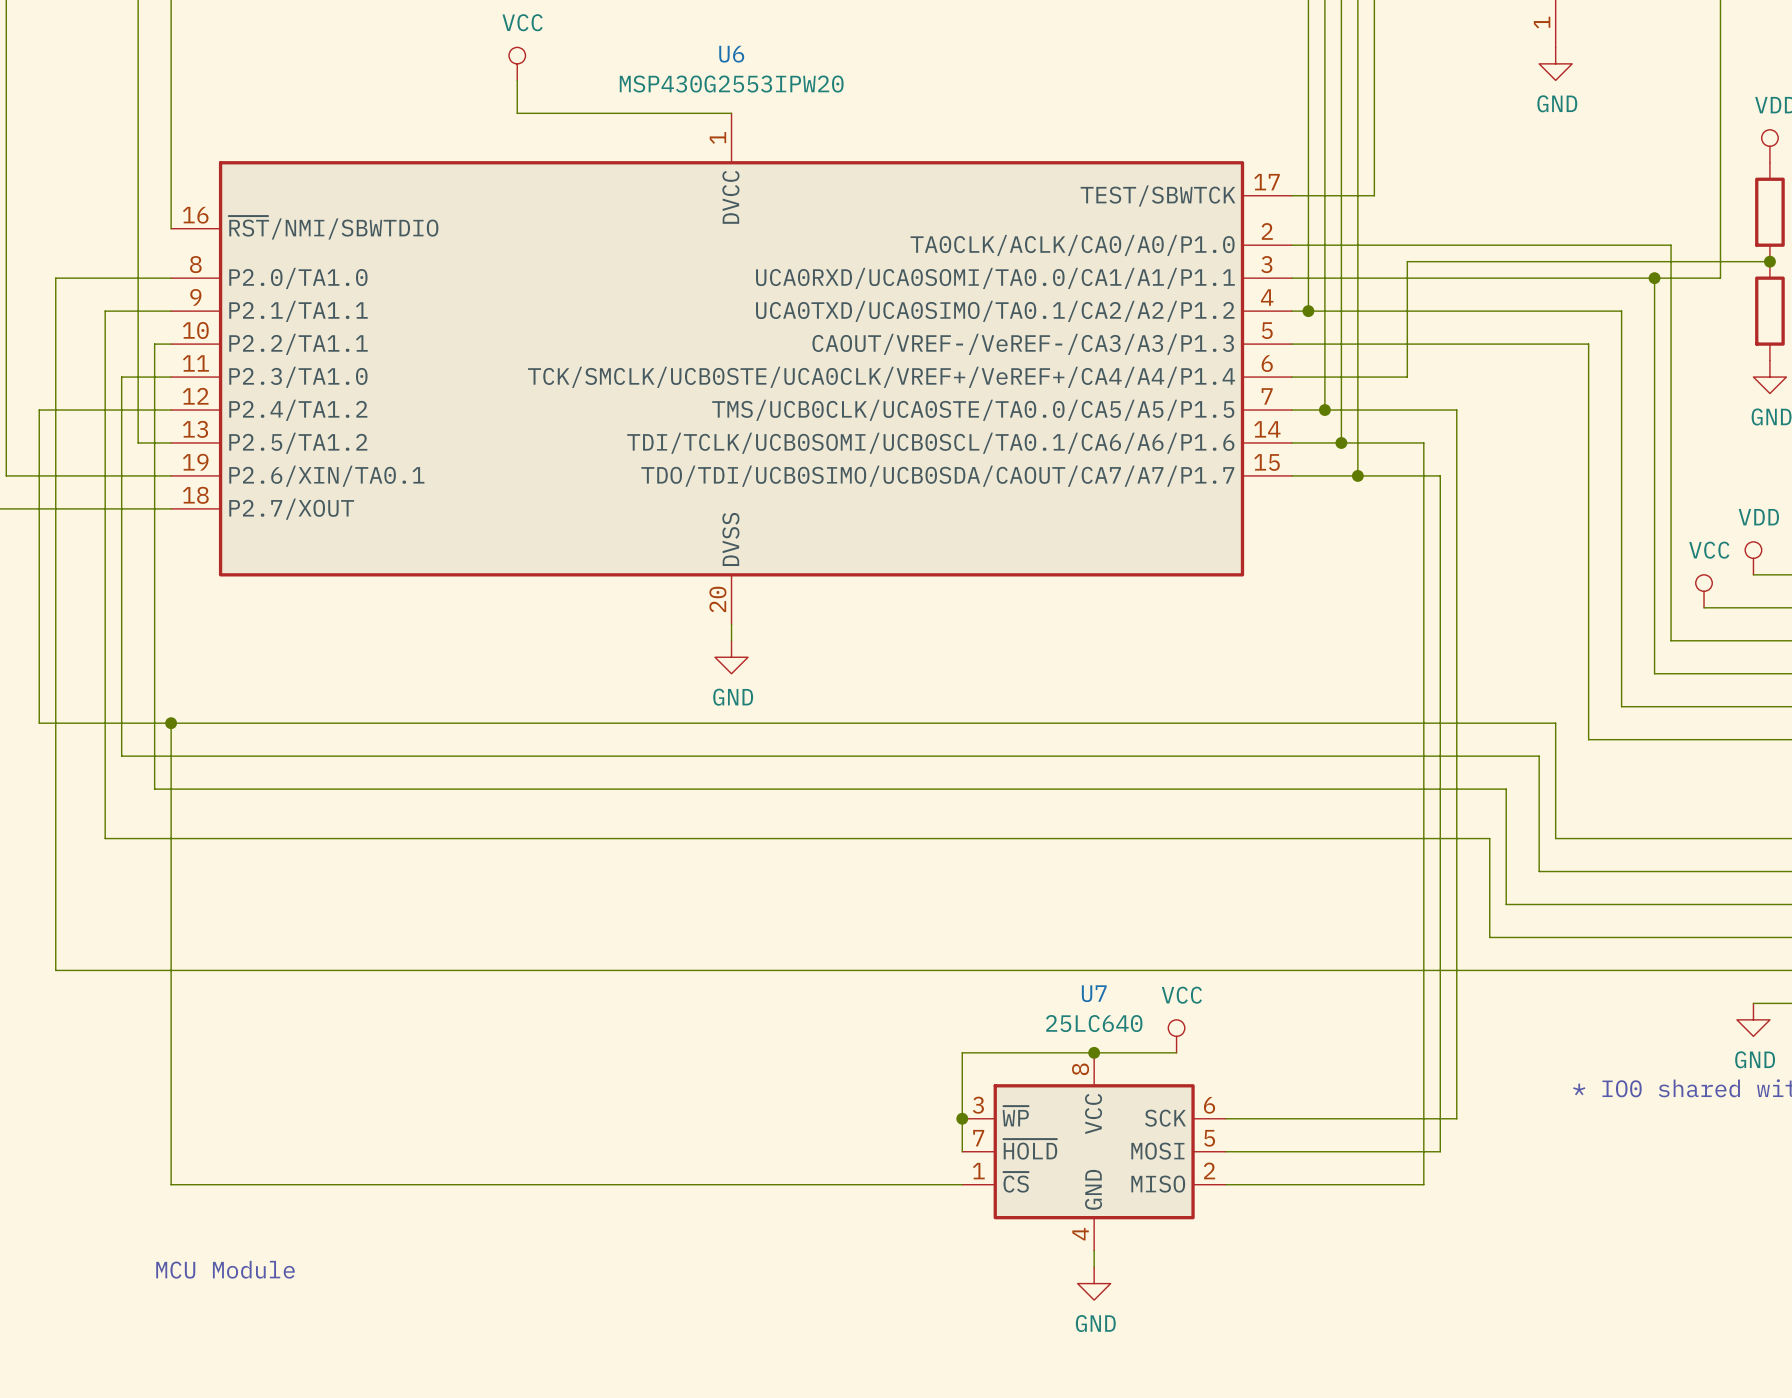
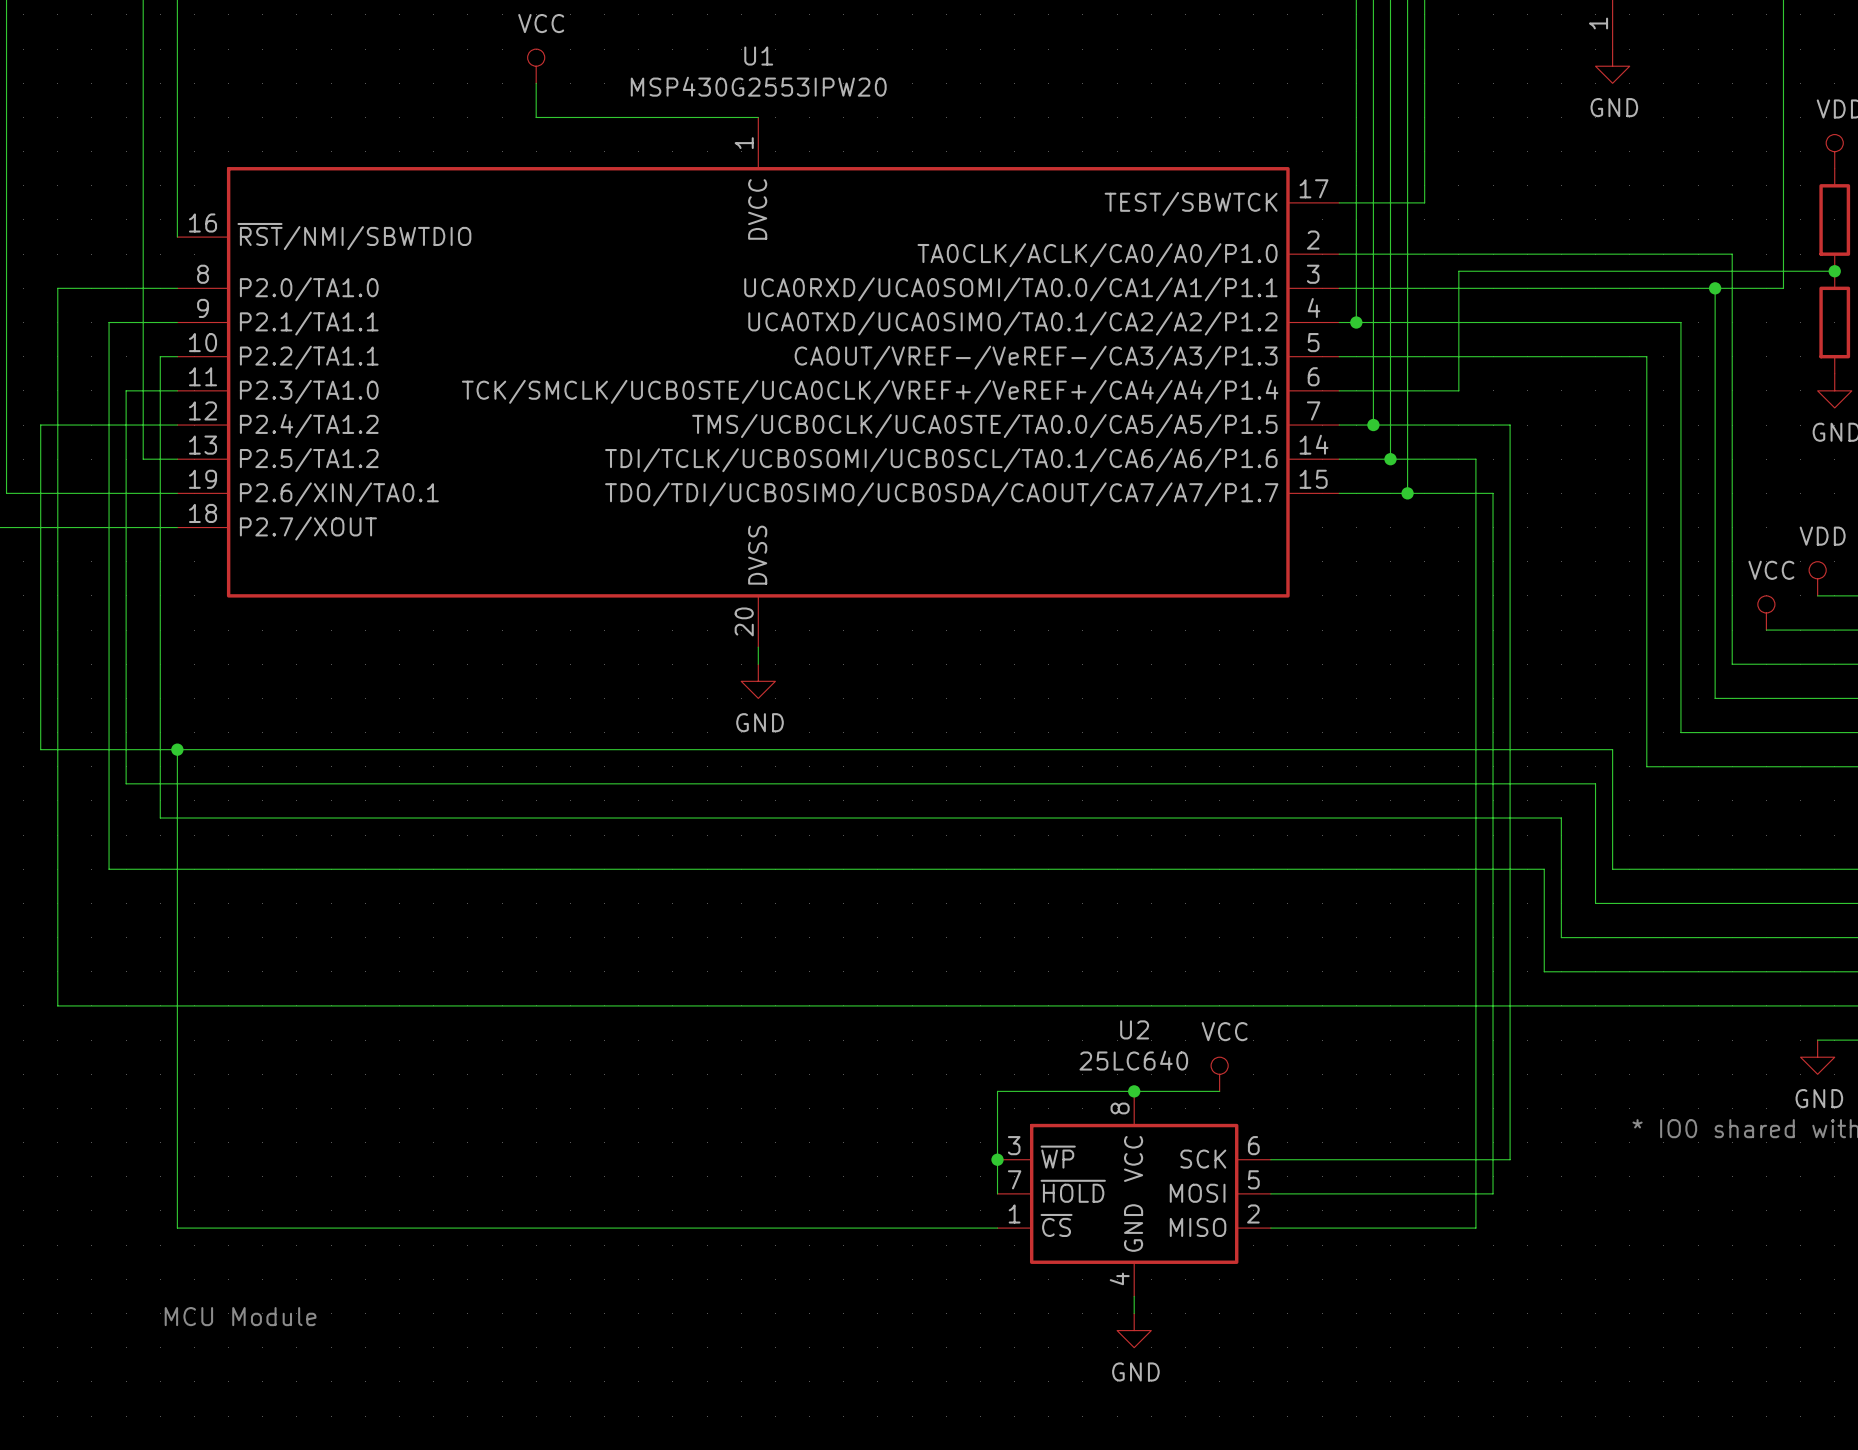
U6 name: U6 (731, 54) -> U1 (758, 56)
U7 name: U7 (1094, 993) -> U2 (1134, 1029)

